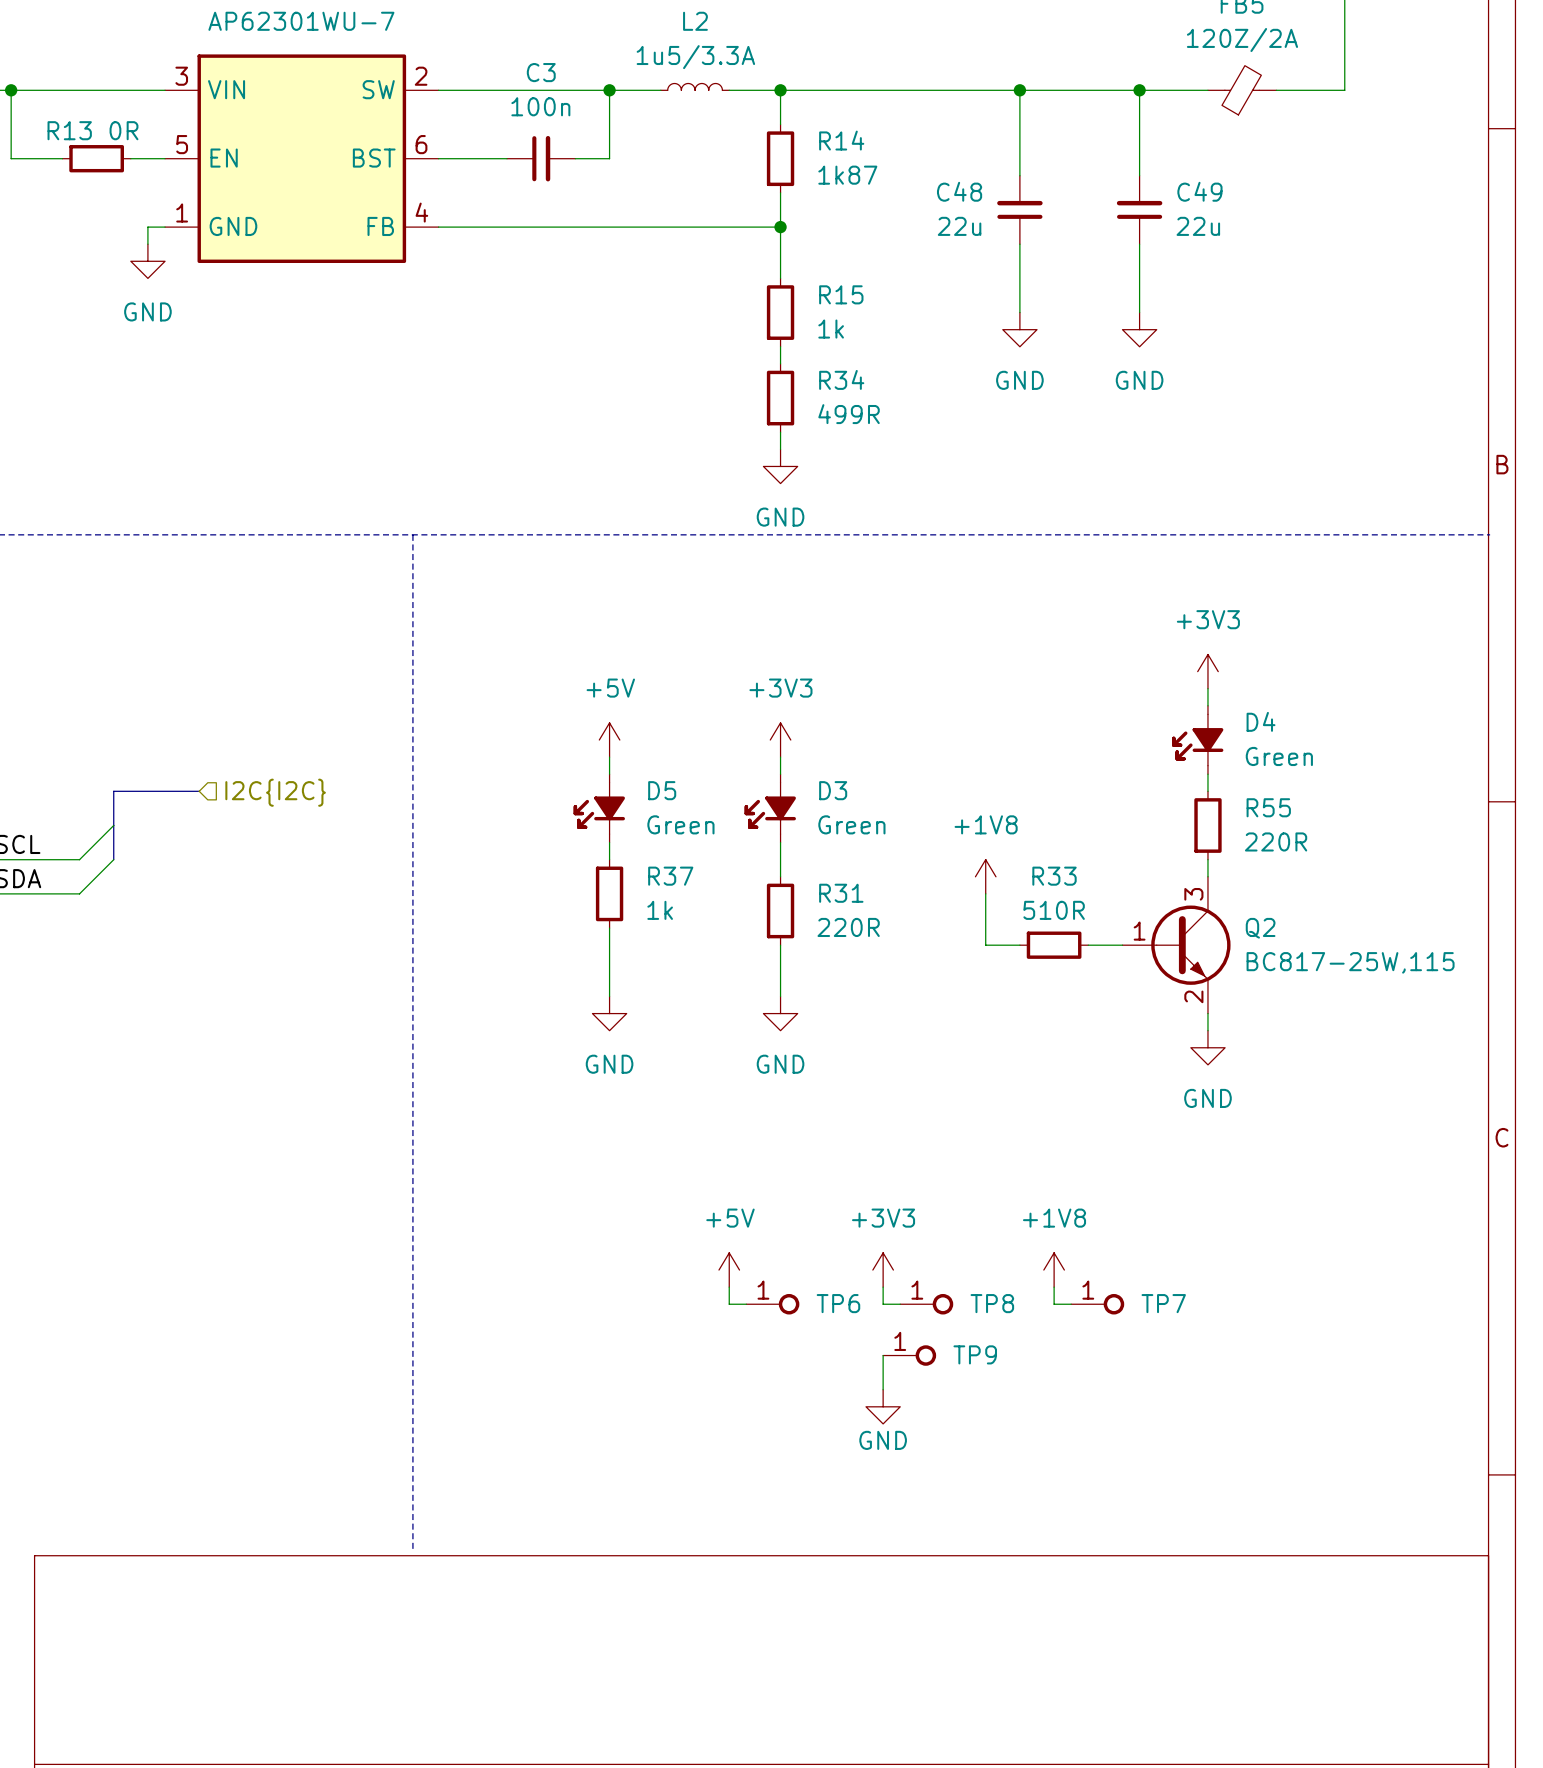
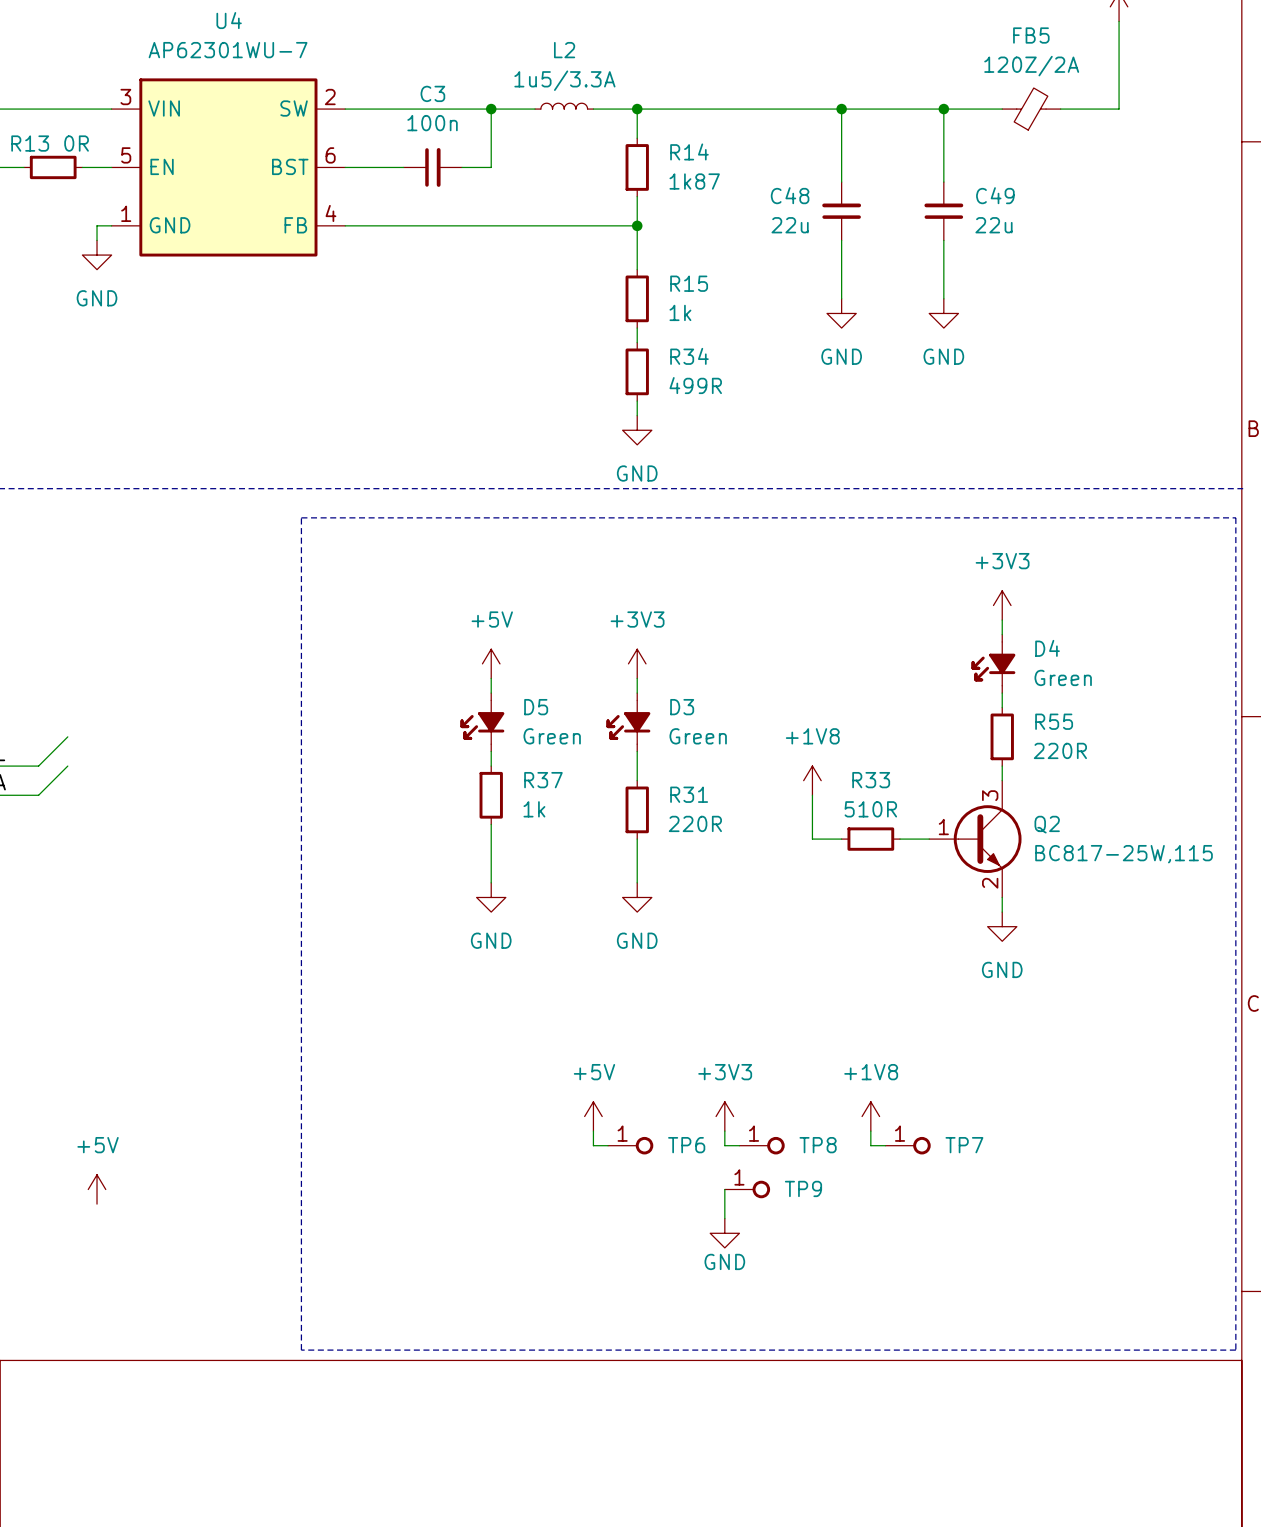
line: (412, 534) (412, 1552) -> none
line: none -> (301, 517) (1235, 517) (1235, 1350) (301, 1350) (301, 517)
bus: (199, 791) (113, 791) (113, 859) -> none
hierarchical label: I2C{I2C} (275, 792) -> none
power symbol: none -> +5V (97, 1189)

